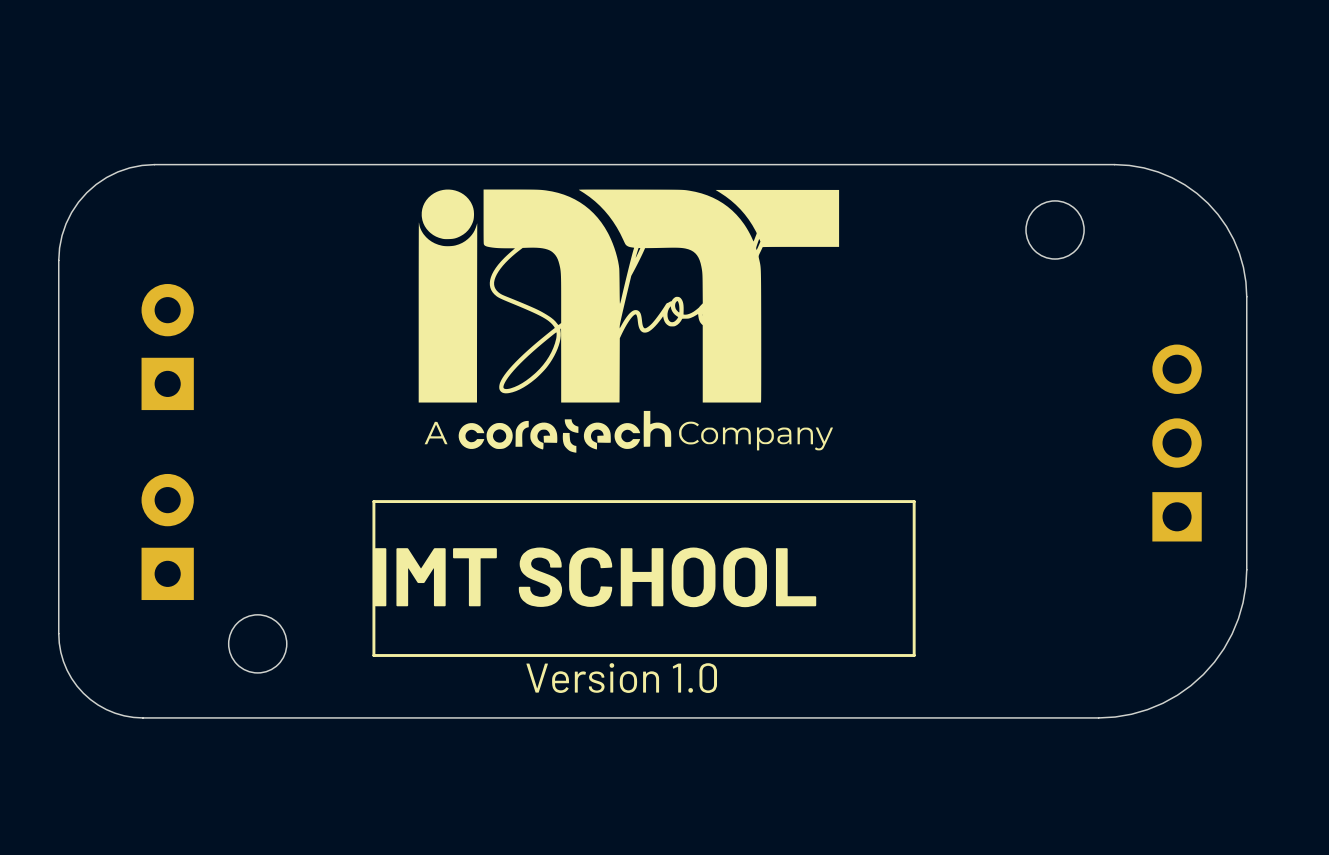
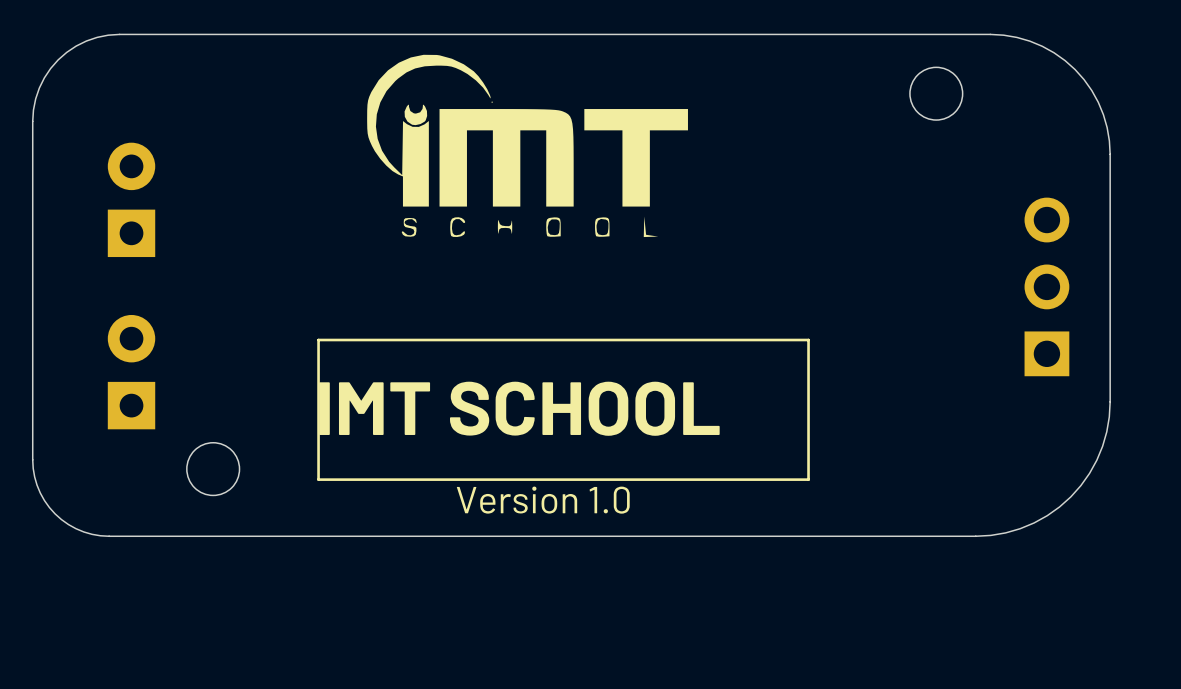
drawing: none -> [367, 54, 688, 238]
drawing: [418, 189, 840, 453] -> none

